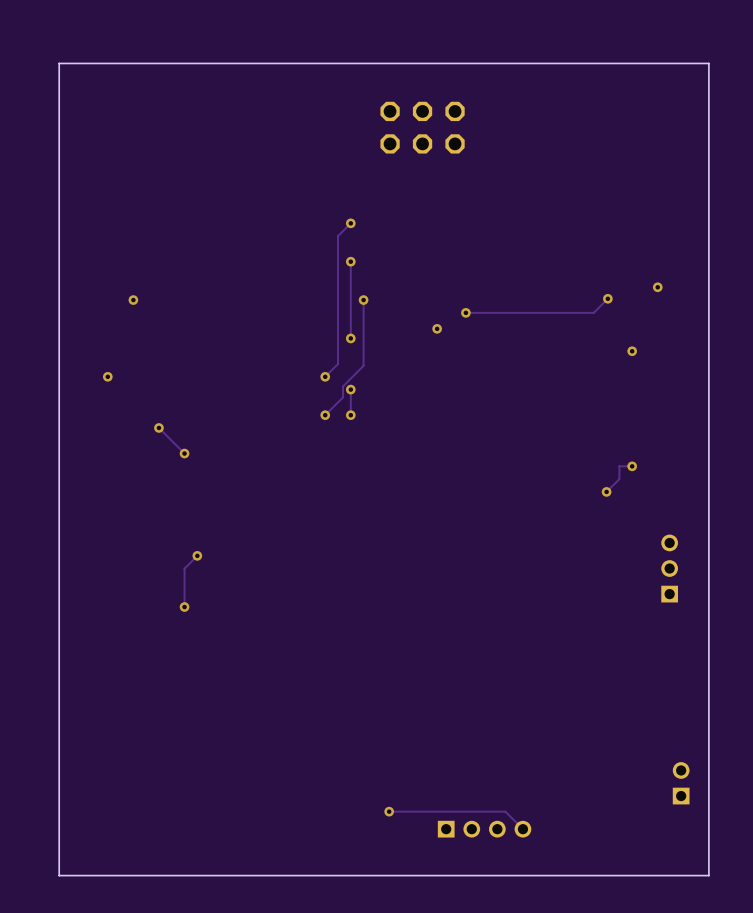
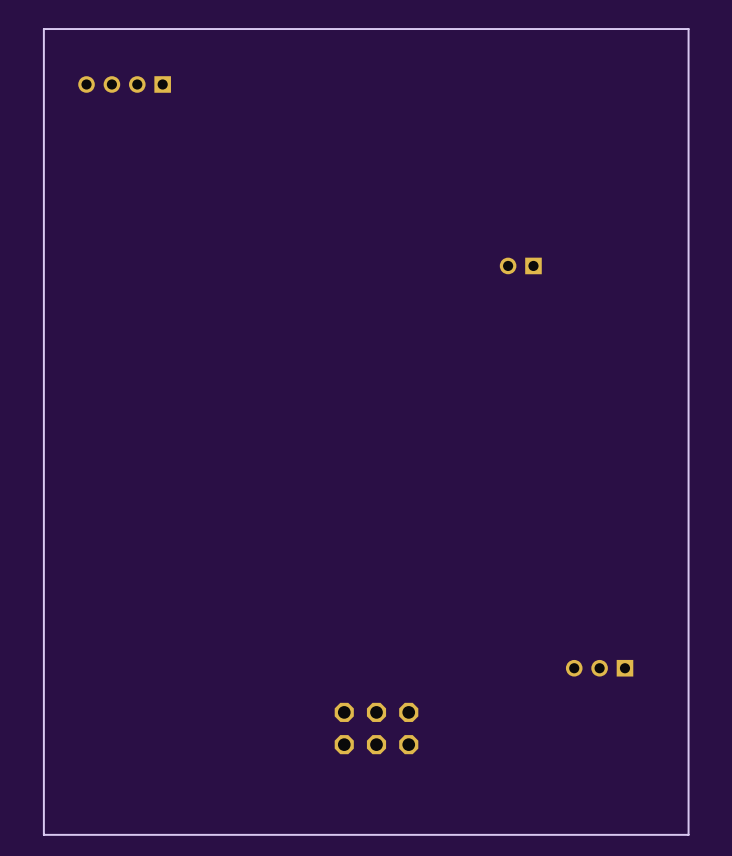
part: none -> (124, 84)
part: (422, 127) -> none
track: (350, 223) (338, 236) (338, 364) (325, 376) -> none
via: (350, 223) -> none
track: (350, 261) (350, 338) -> none
via: (350, 261) -> none
via: (657, 287) -> none
track: (607, 298) (593, 312) (465, 312) -> none
via: (607, 298) -> none
via: (133, 300) -> none
track: (363, 300) (363, 365) (343, 386) (343, 397) (325, 415) -> none
via: (363, 300) -> none
part: none -> (520, 265)
via: (465, 312) -> none
via: (437, 328) -> none
via: (350, 338) -> none
via: (632, 351) -> none
via: (107, 376) -> none
via: (325, 376) -> none
track: (350, 389) (350, 415) -> none
via: (350, 389) -> none
via: (325, 415) -> none
via: (350, 415) -> none
track: (158, 427) (184, 453) -> none
via: (158, 427) -> none
via: (184, 453) -> none
track: (632, 466) (619, 466) (619, 479) (606, 491) -> none
via: (632, 466) -> none
via: (606, 491) -> none
track: (197, 555) (184, 568) (184, 607) -> none
via: (197, 555) -> none
part rotation: 0° (669, 568) -> 90° counterclockwise (599, 668)
part position: (669, 568) -> (599, 668)
via: (184, 607) -> none
part: none -> (376, 728)
part: (681, 783) -> none
track: (389, 811) (505, 811) (522, 829) -> none
via: (389, 811) -> none
part: (484, 829) -> none

